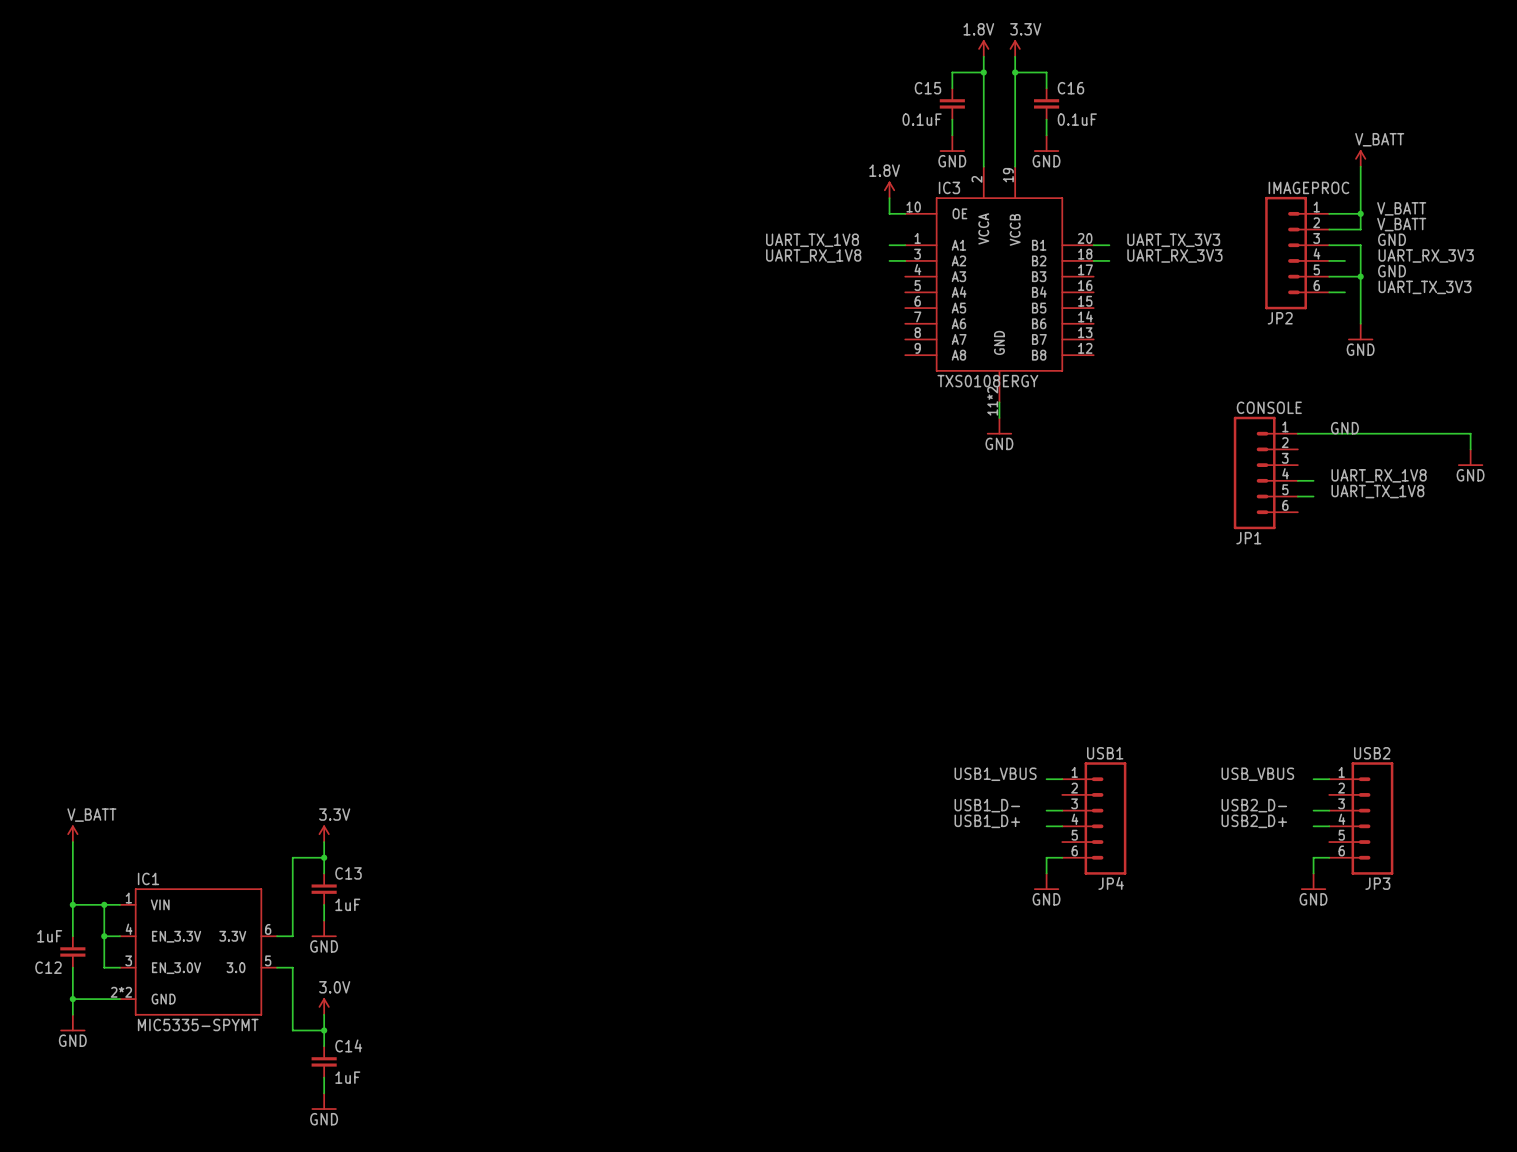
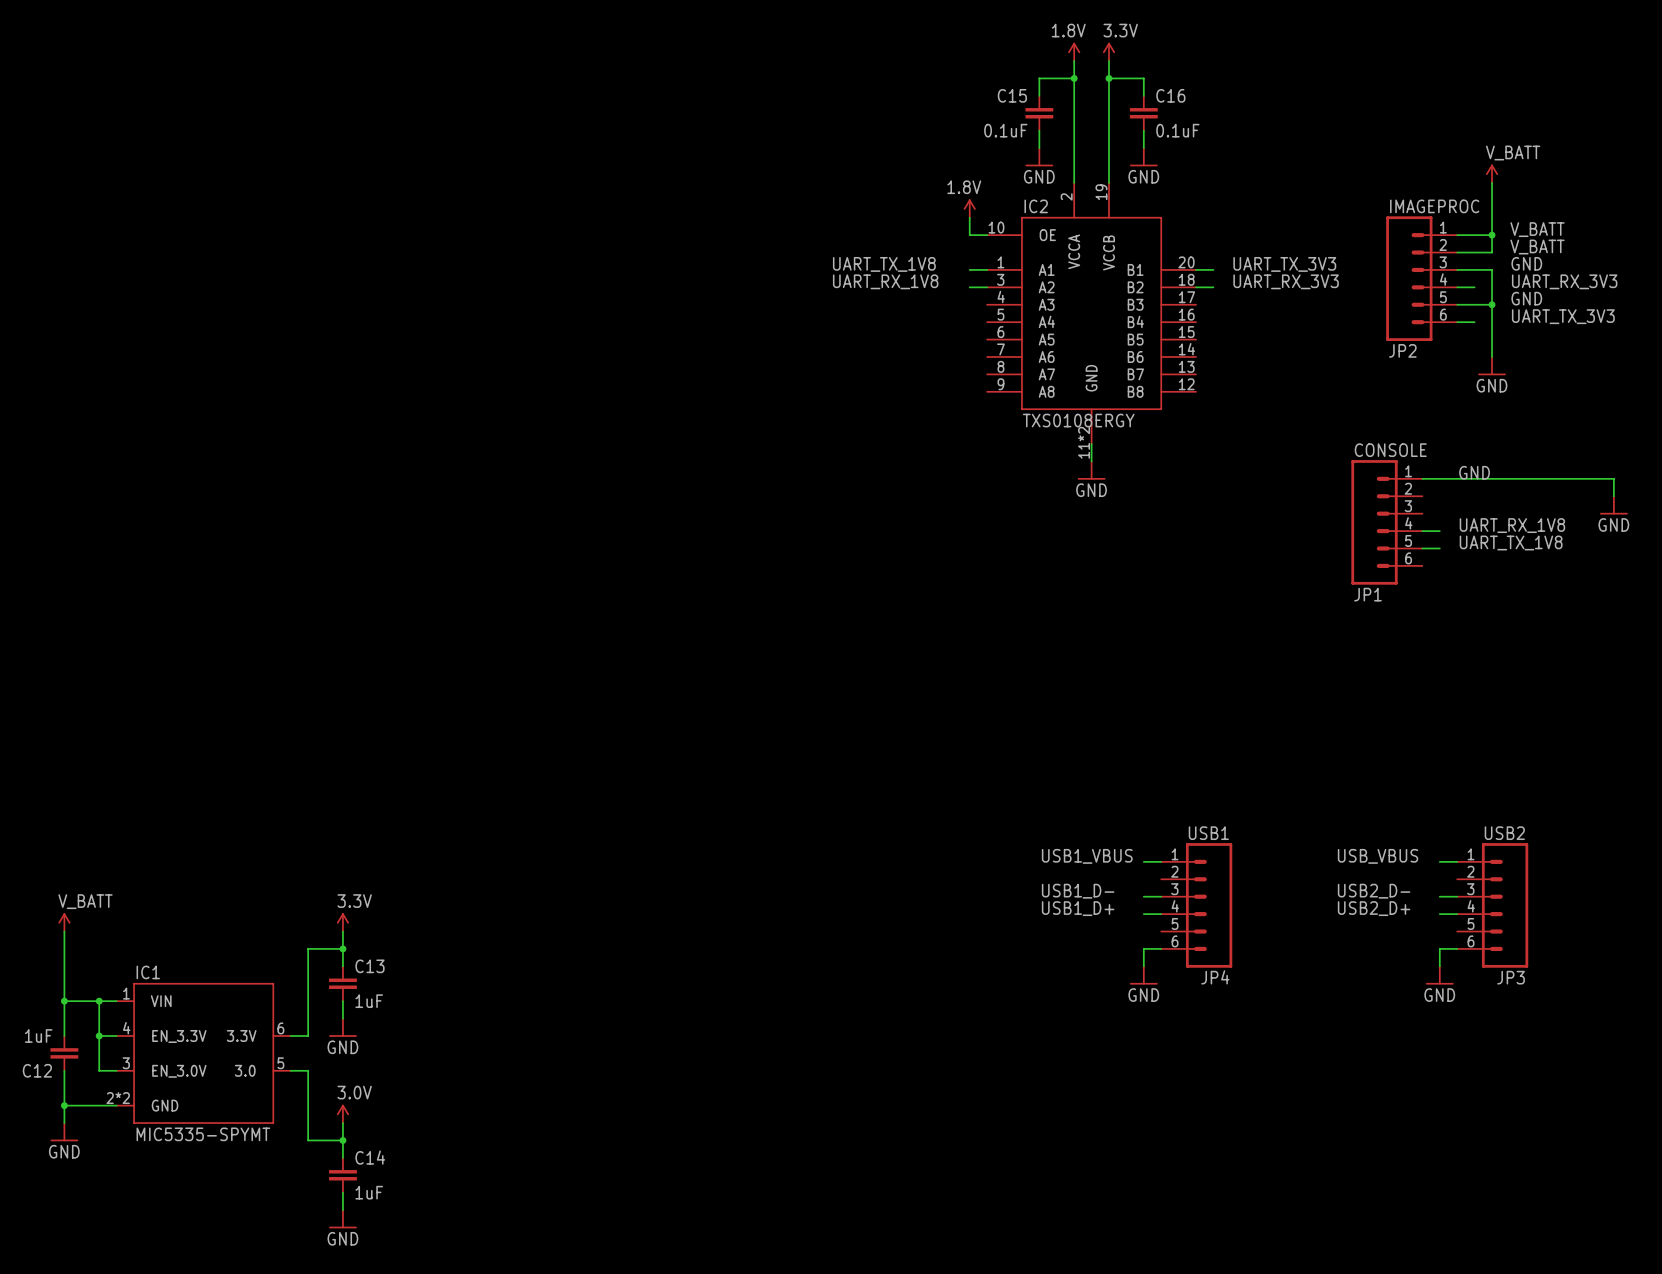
IC3 name: IC3 (949, 187) -> IC2 (1036, 206)

